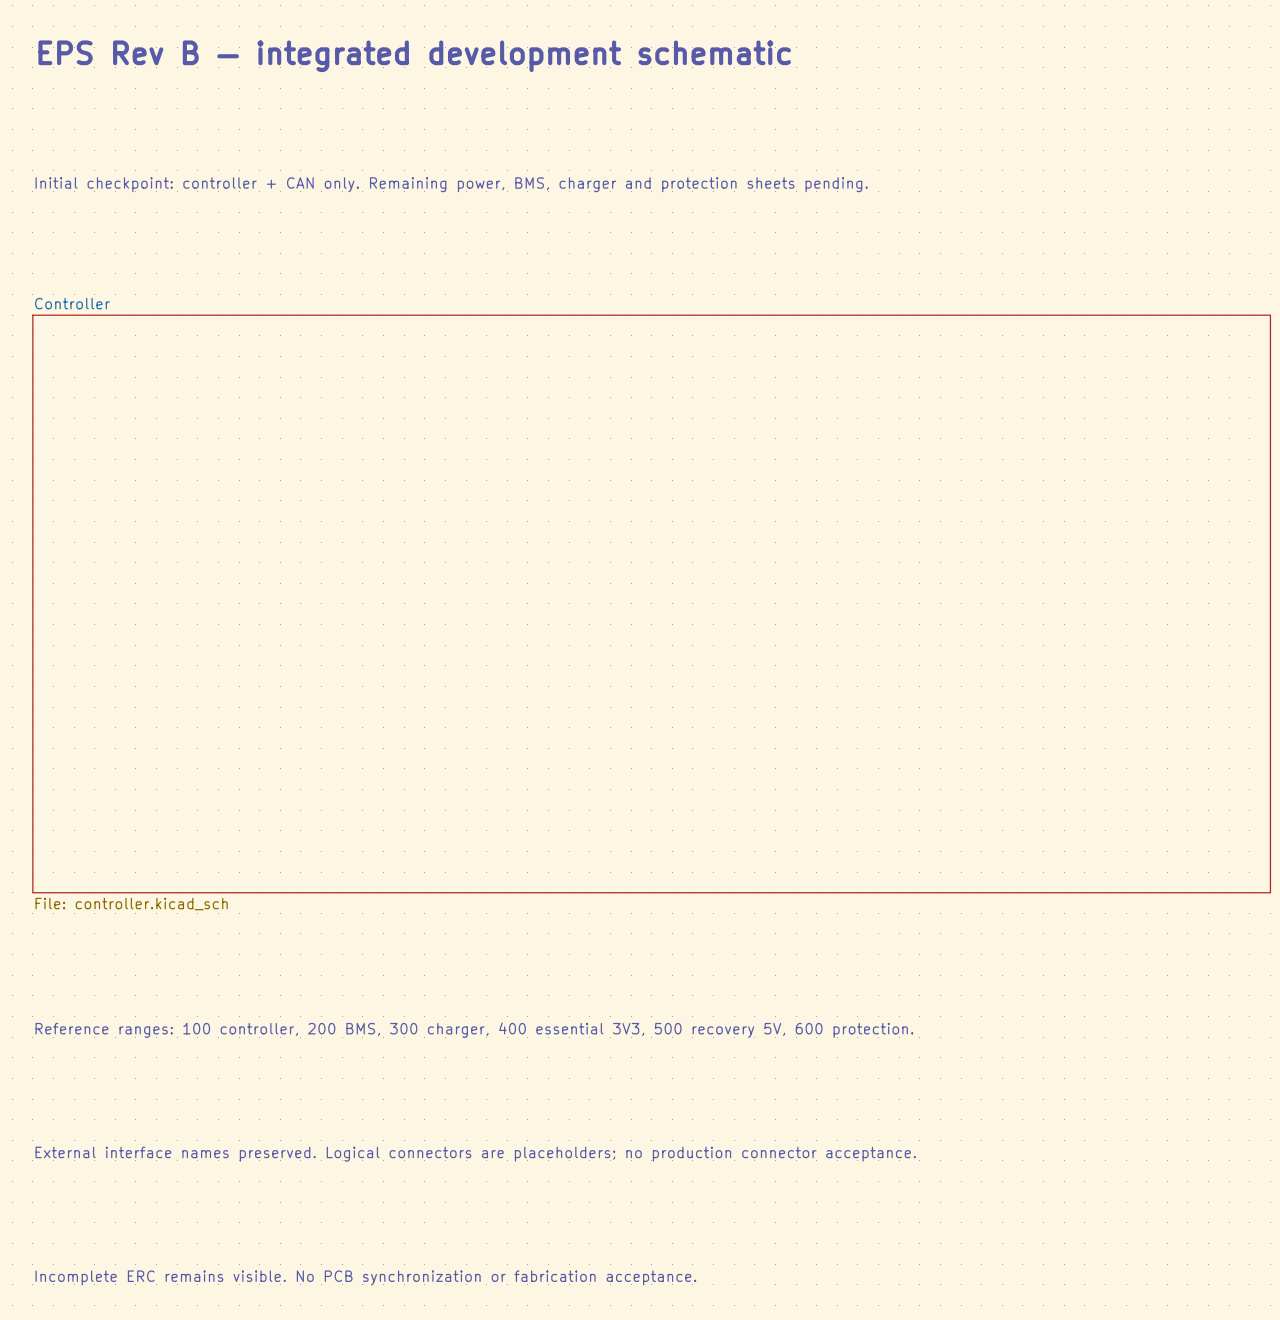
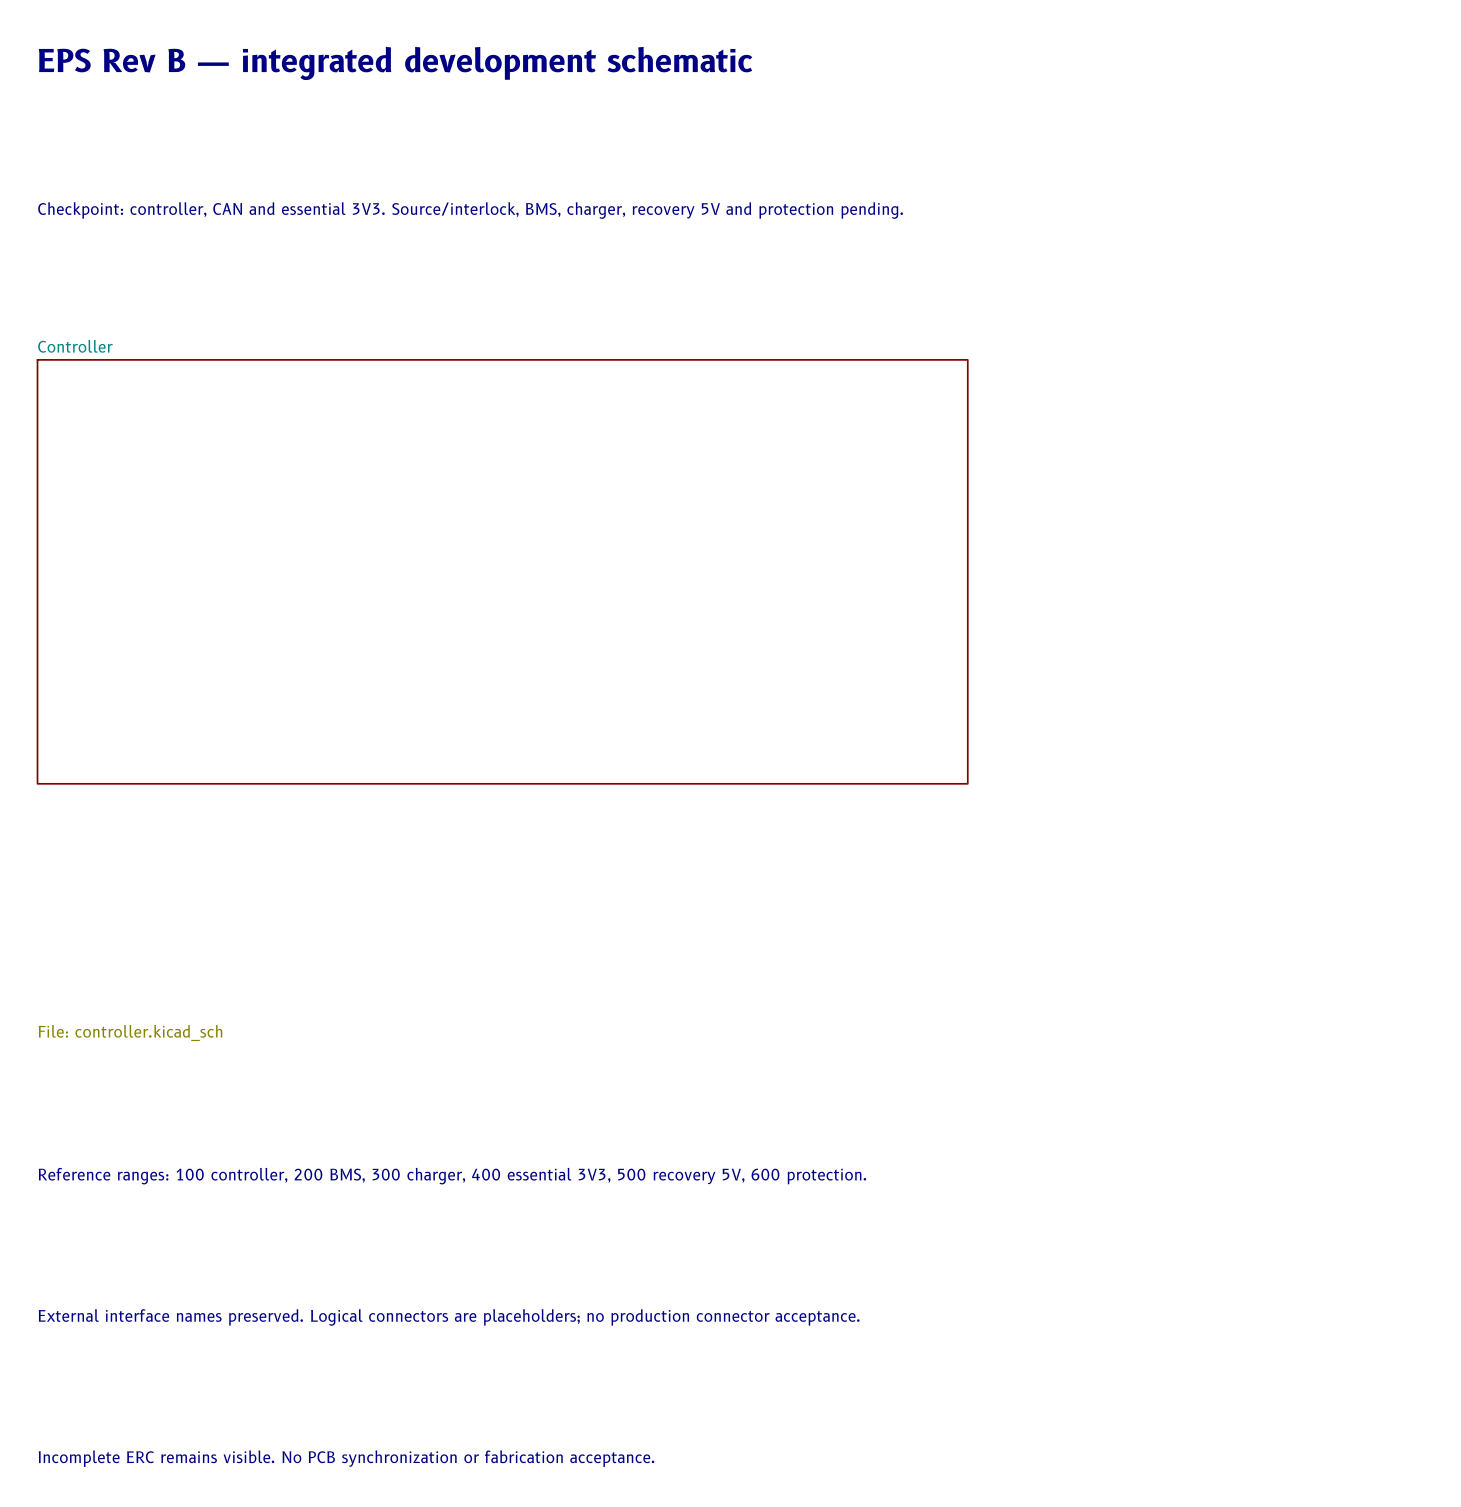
text: Initial checkpoint: controller + CAN only. Remaining power, BMS, charger and protection sheets pending. (451, 184) -> Checkpoint: controller, CAN and essential 3V3. Source/interlock, BMS, charger, recovery 5V and protection pending. (470, 210)
sheet Controller: none -> File: controller.kicad_sch (502, 571)
sheet Controller: File: controller.kicad_sch (651, 603) -> none

